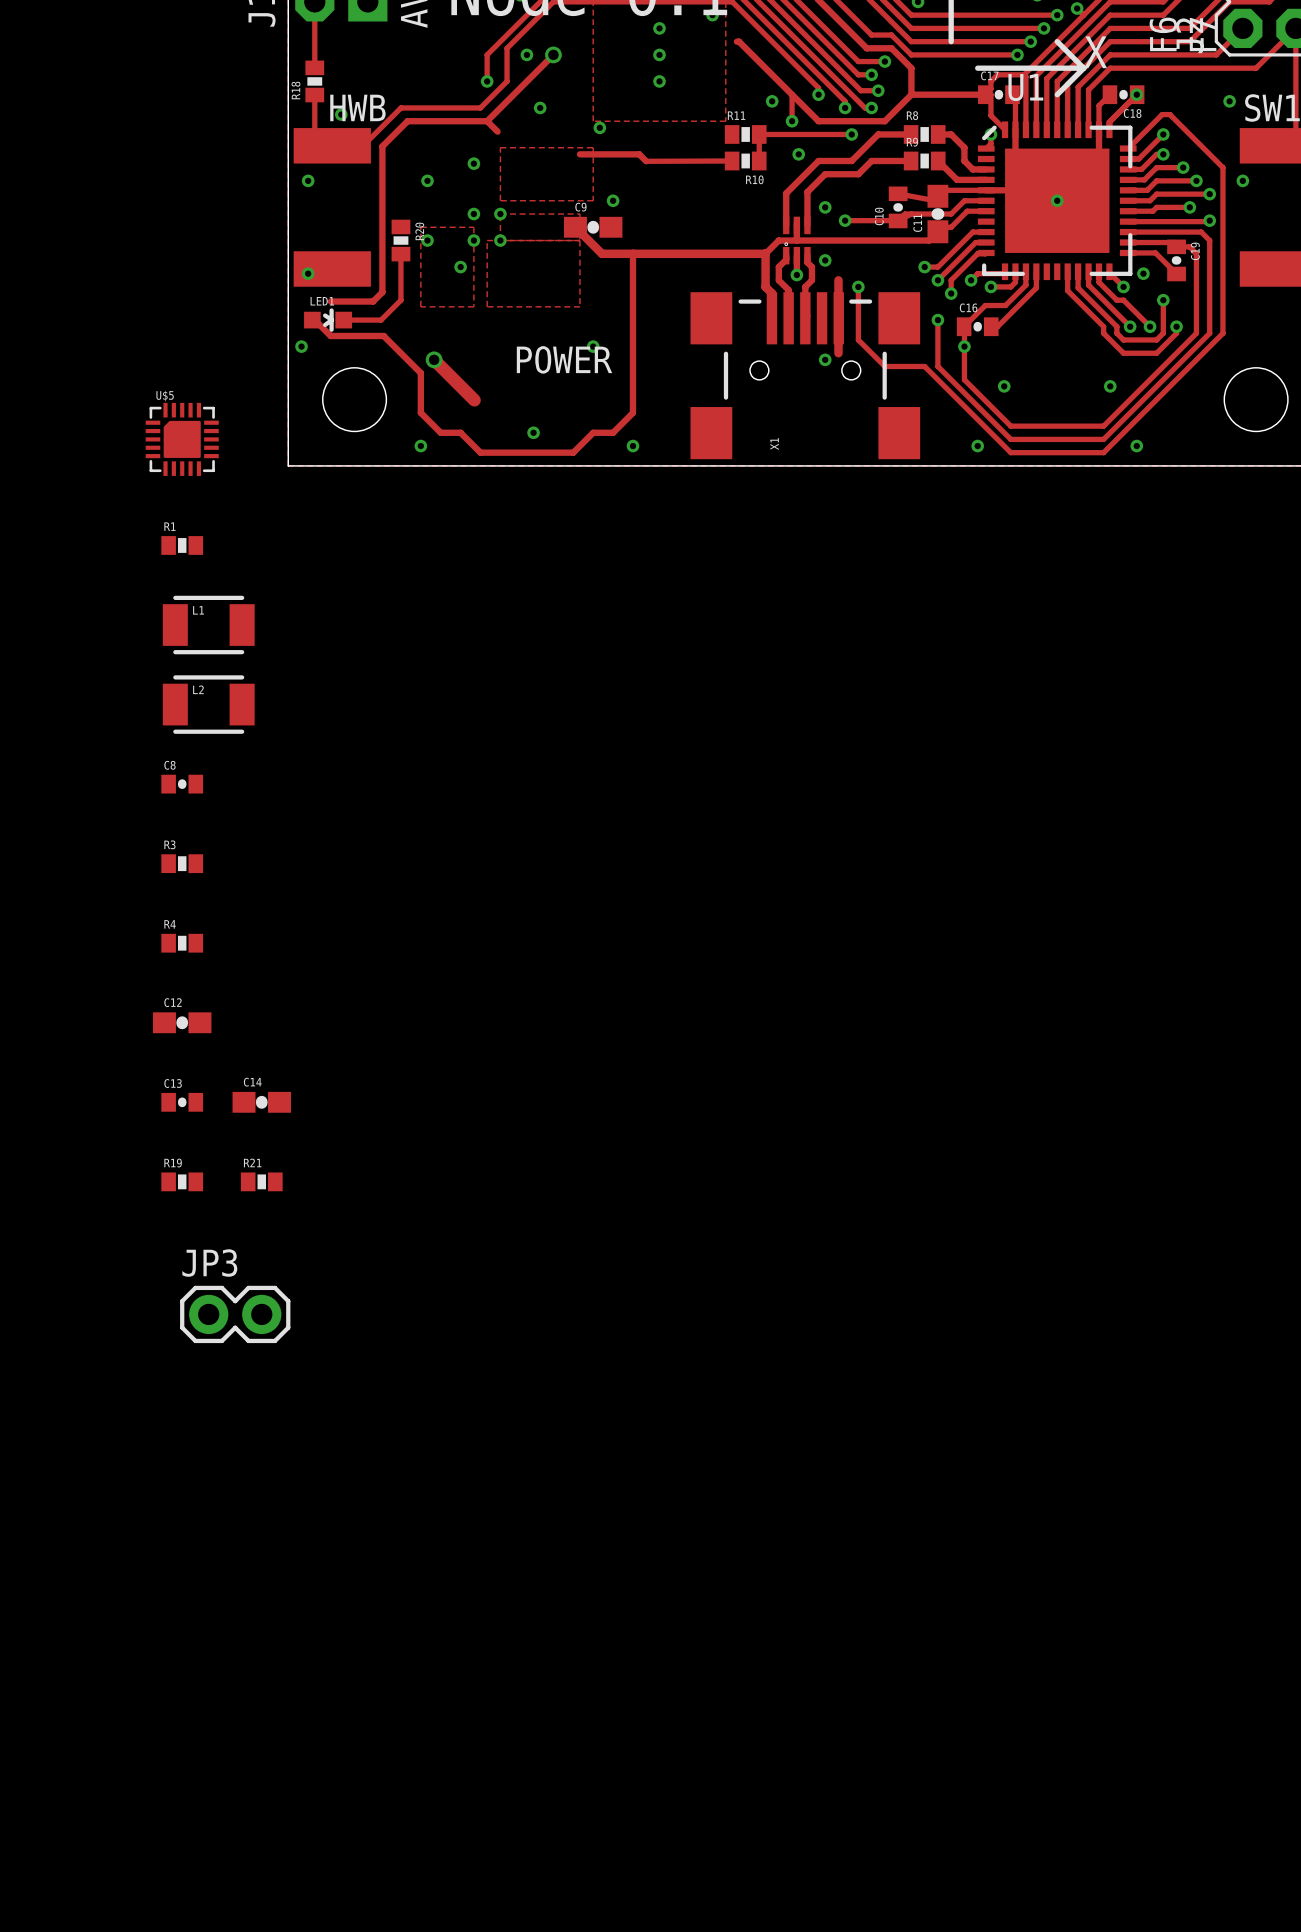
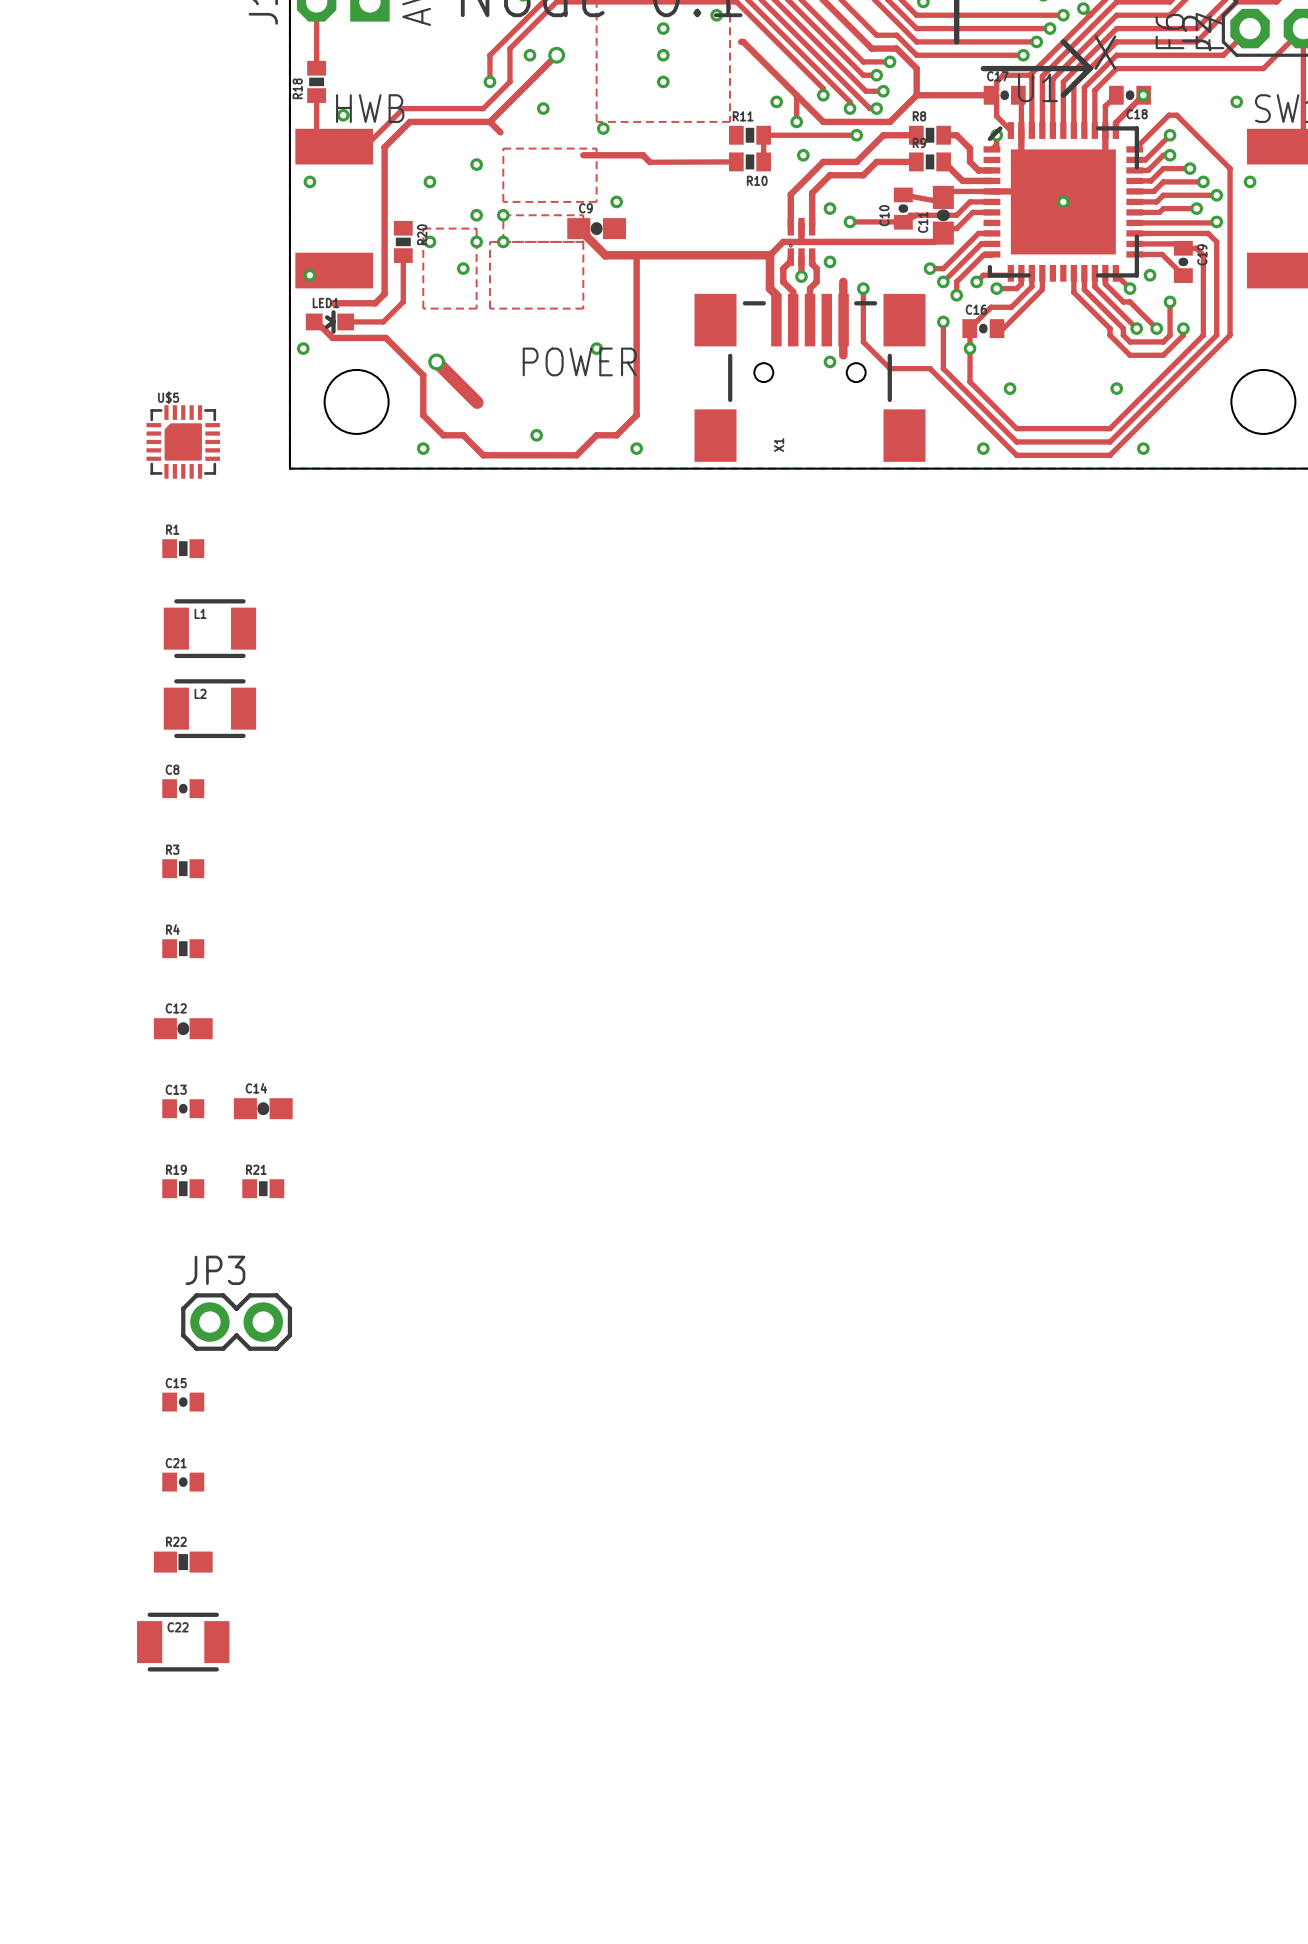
C15: none -> (183, 1402)
C21: none -> (183, 1482)
R22: none -> (183, 1562)
C22: none -> (183, 1642)

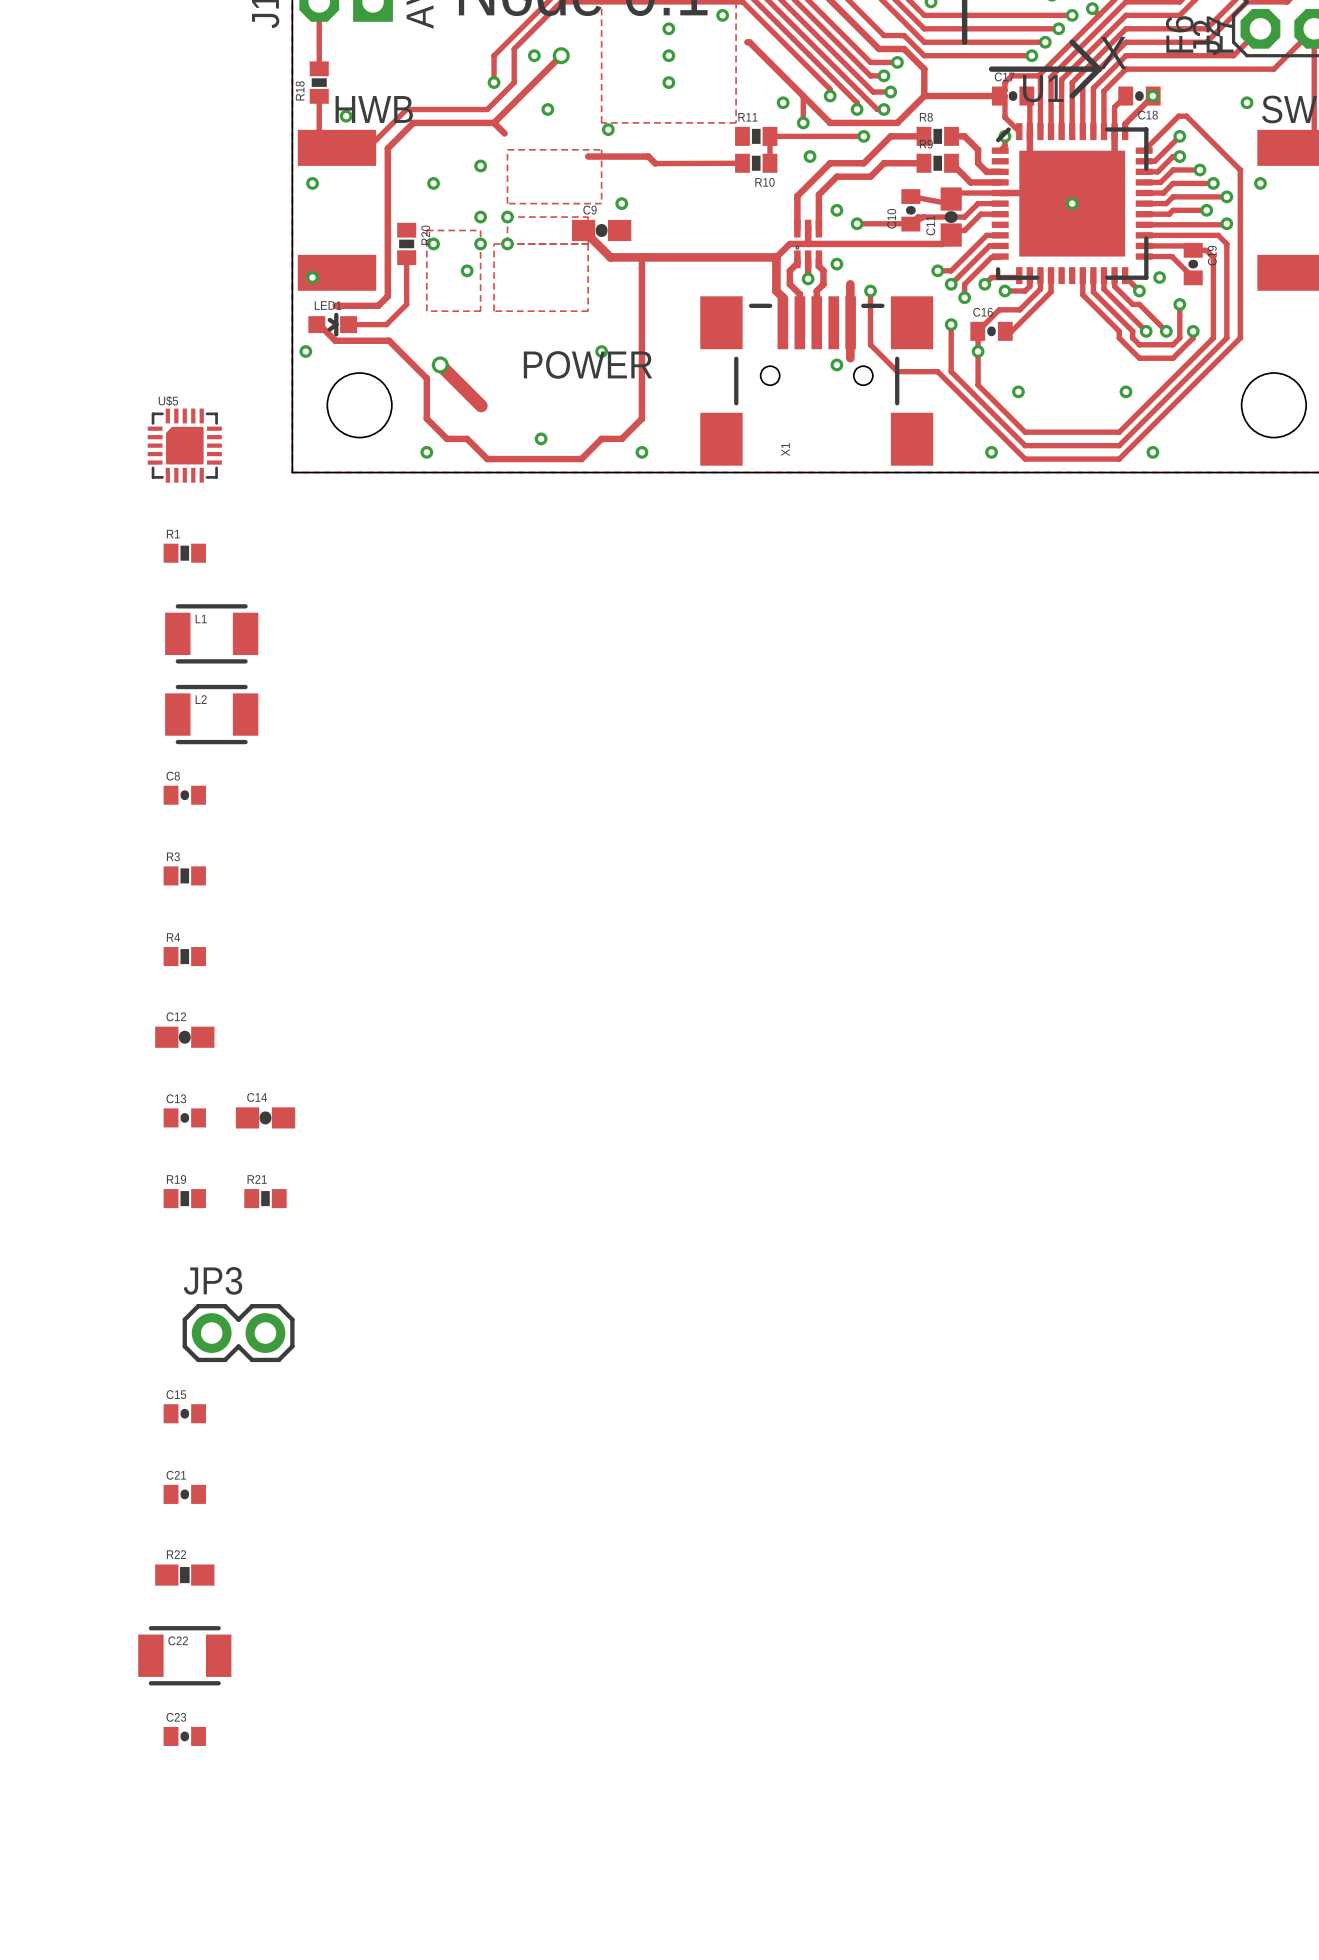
C23: none -> (184, 1736)

